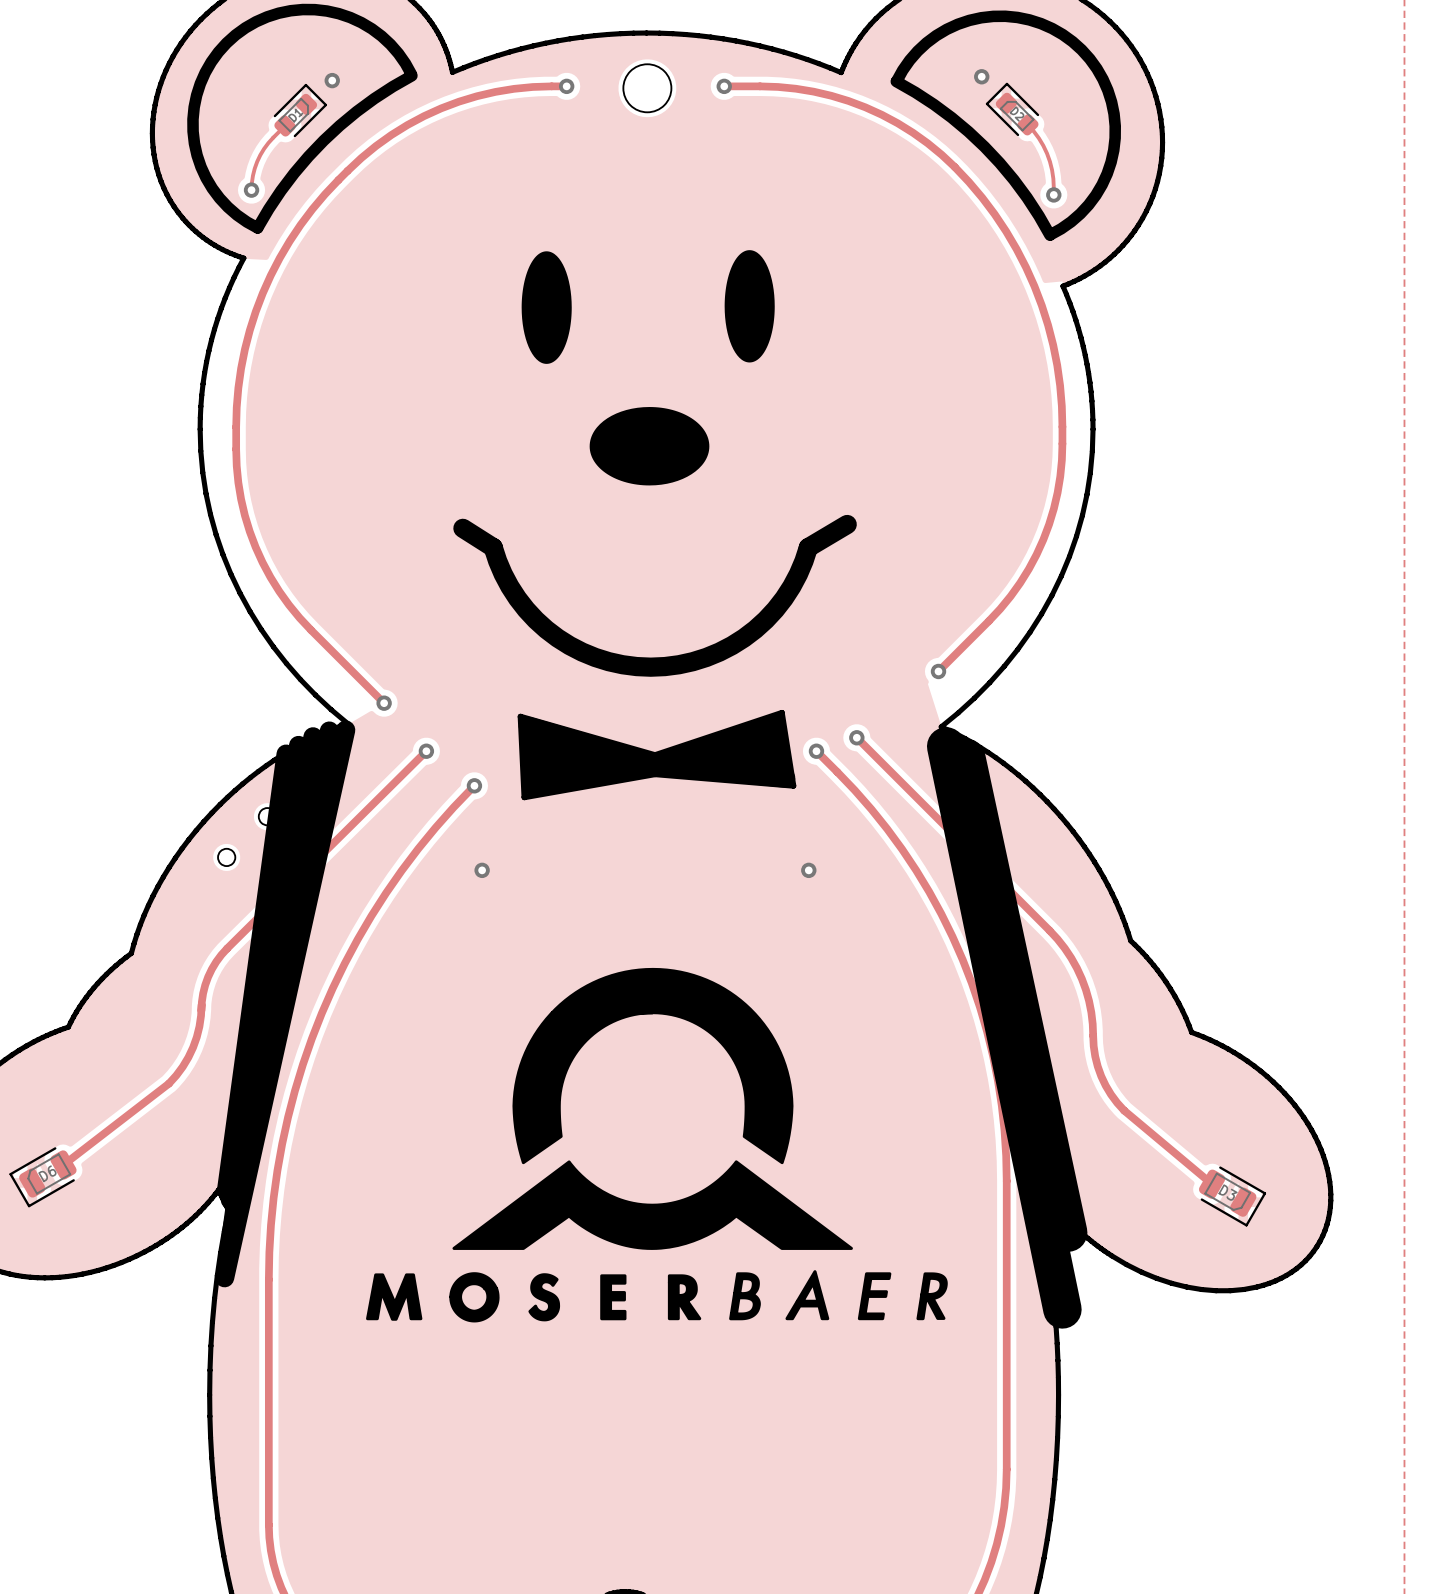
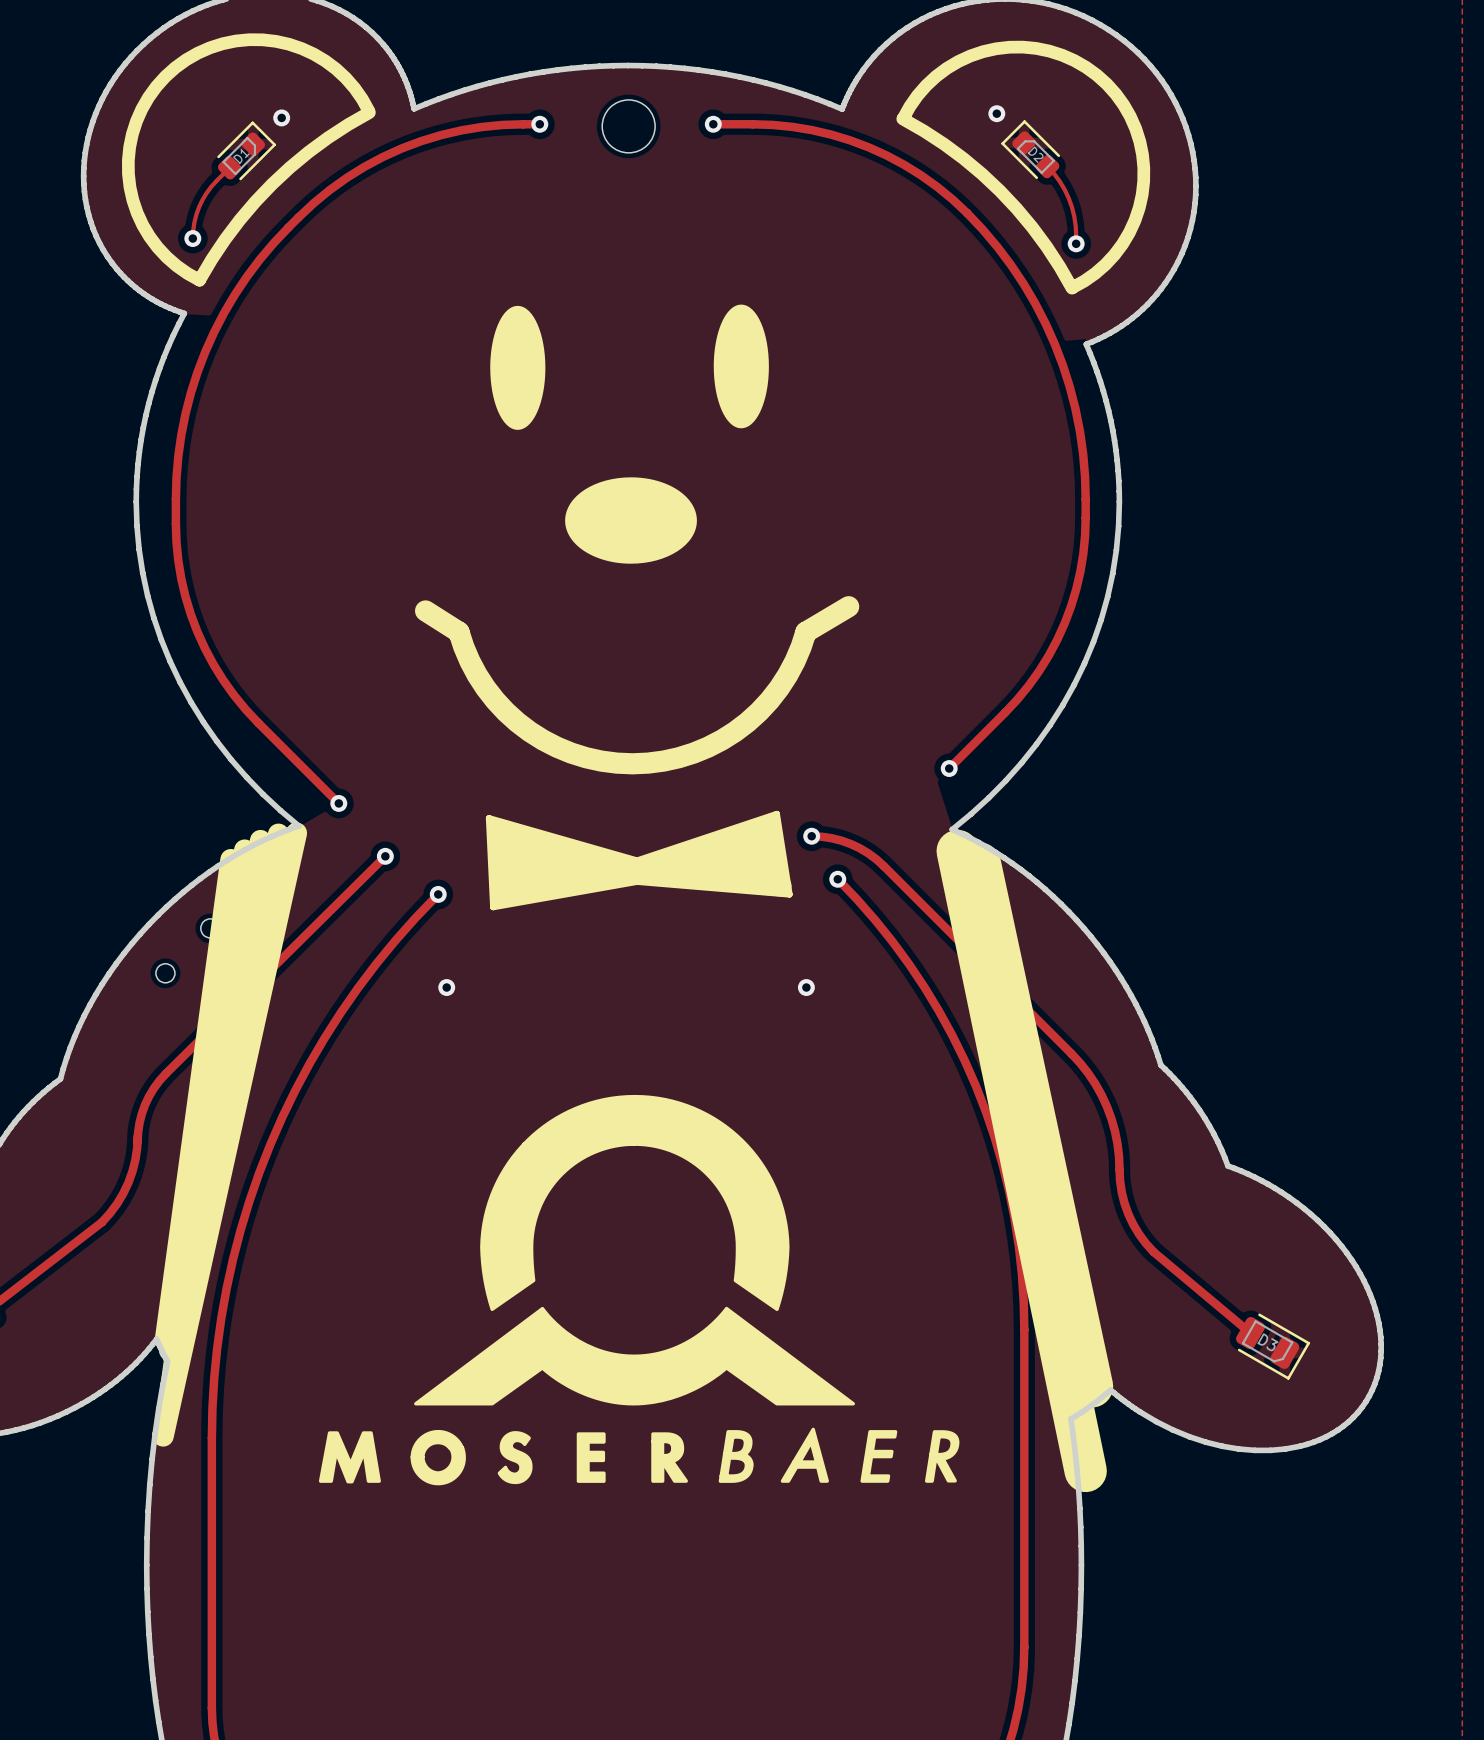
via: none -> (811, 836)
track: (854, 735) (879, 760) -> (811, 836) (831, 838) (850, 844) (868, 853) (883, 866)
via: (856, 737) -> none
track: (816, 751) (837, 772) -> none
via: (816, 751) -> none
via: none -> (837, 879)

